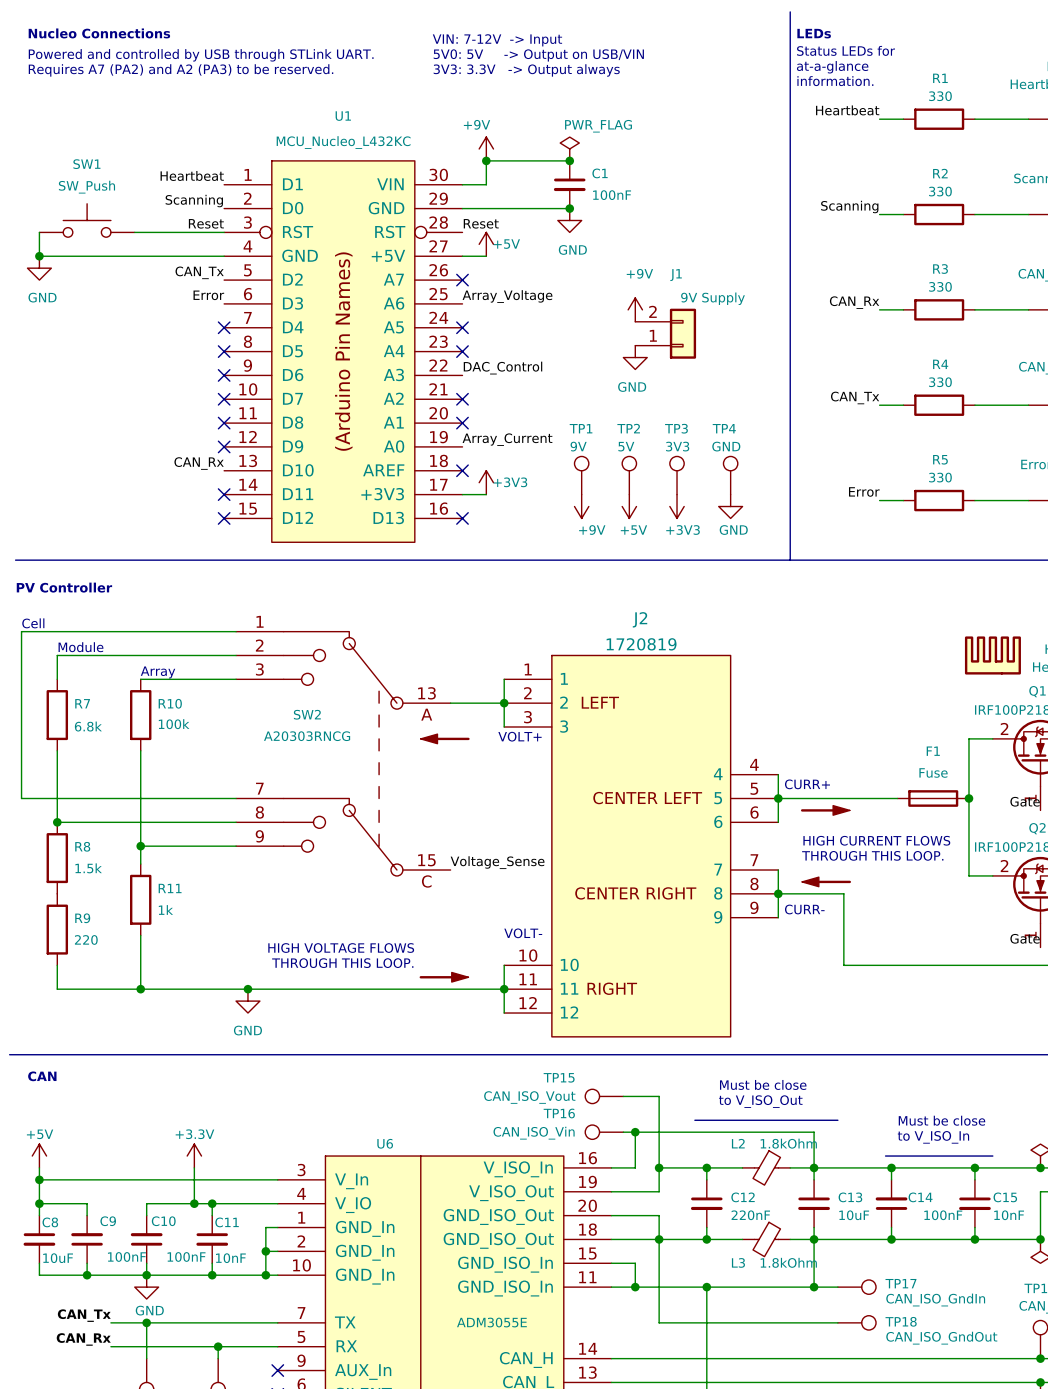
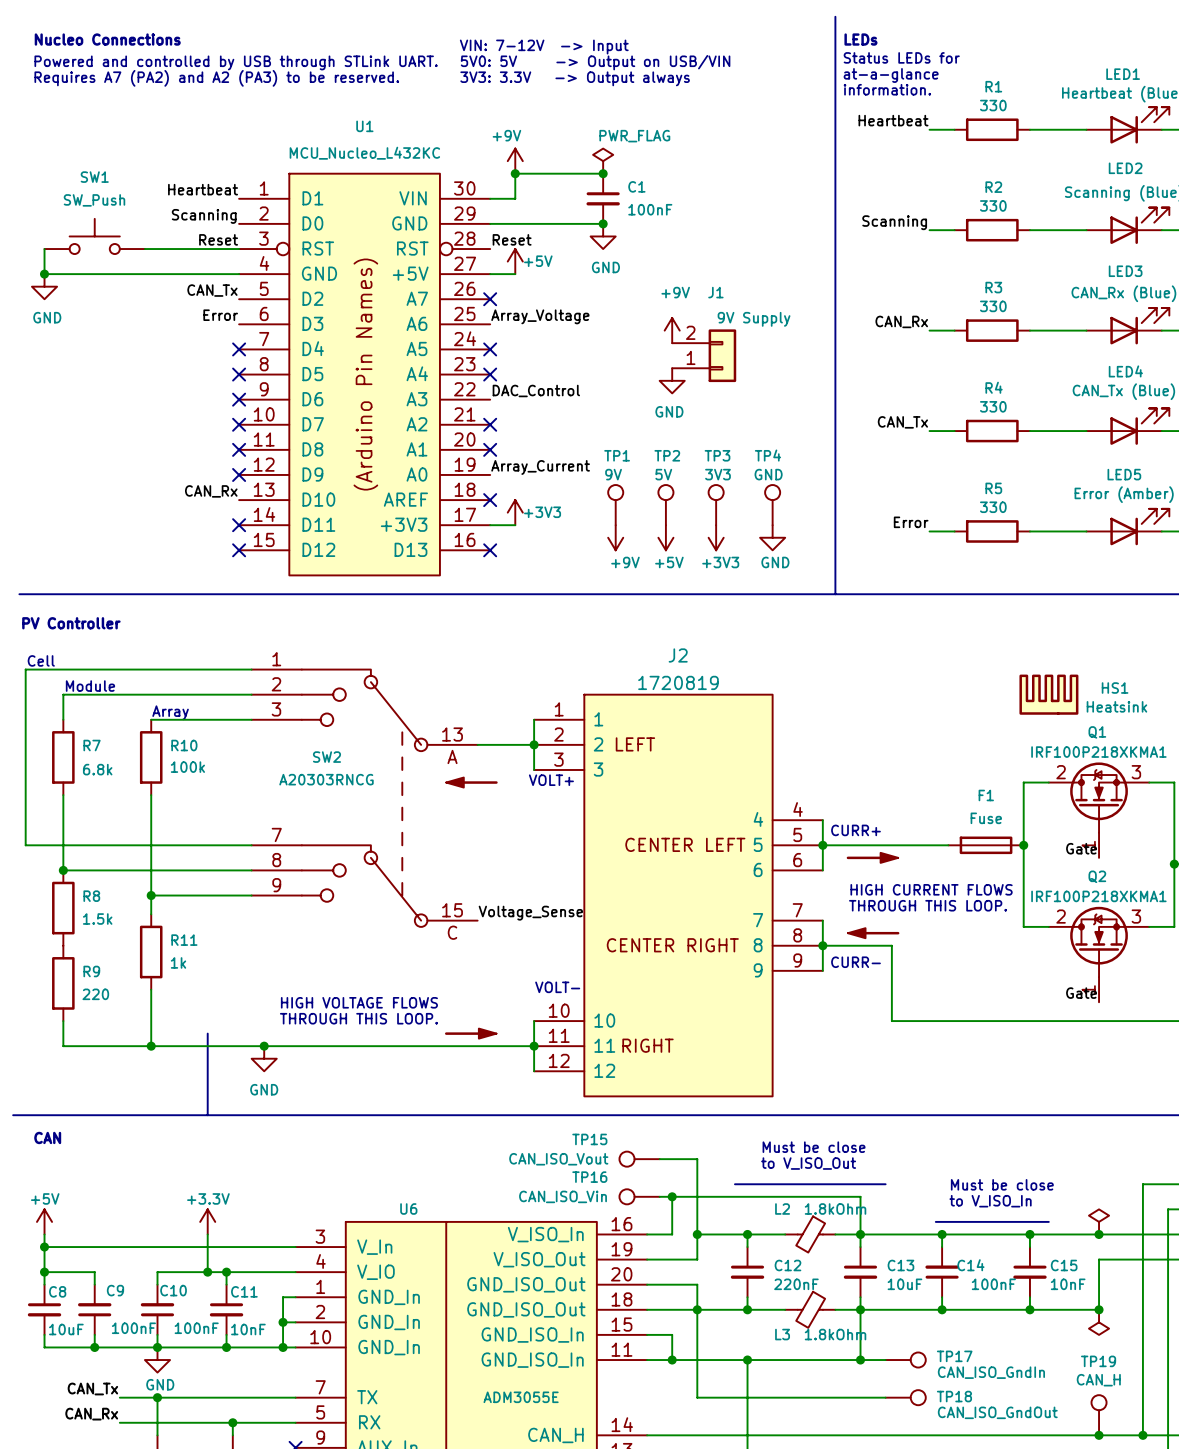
line: none -> (207, 1033) (207, 1115)

